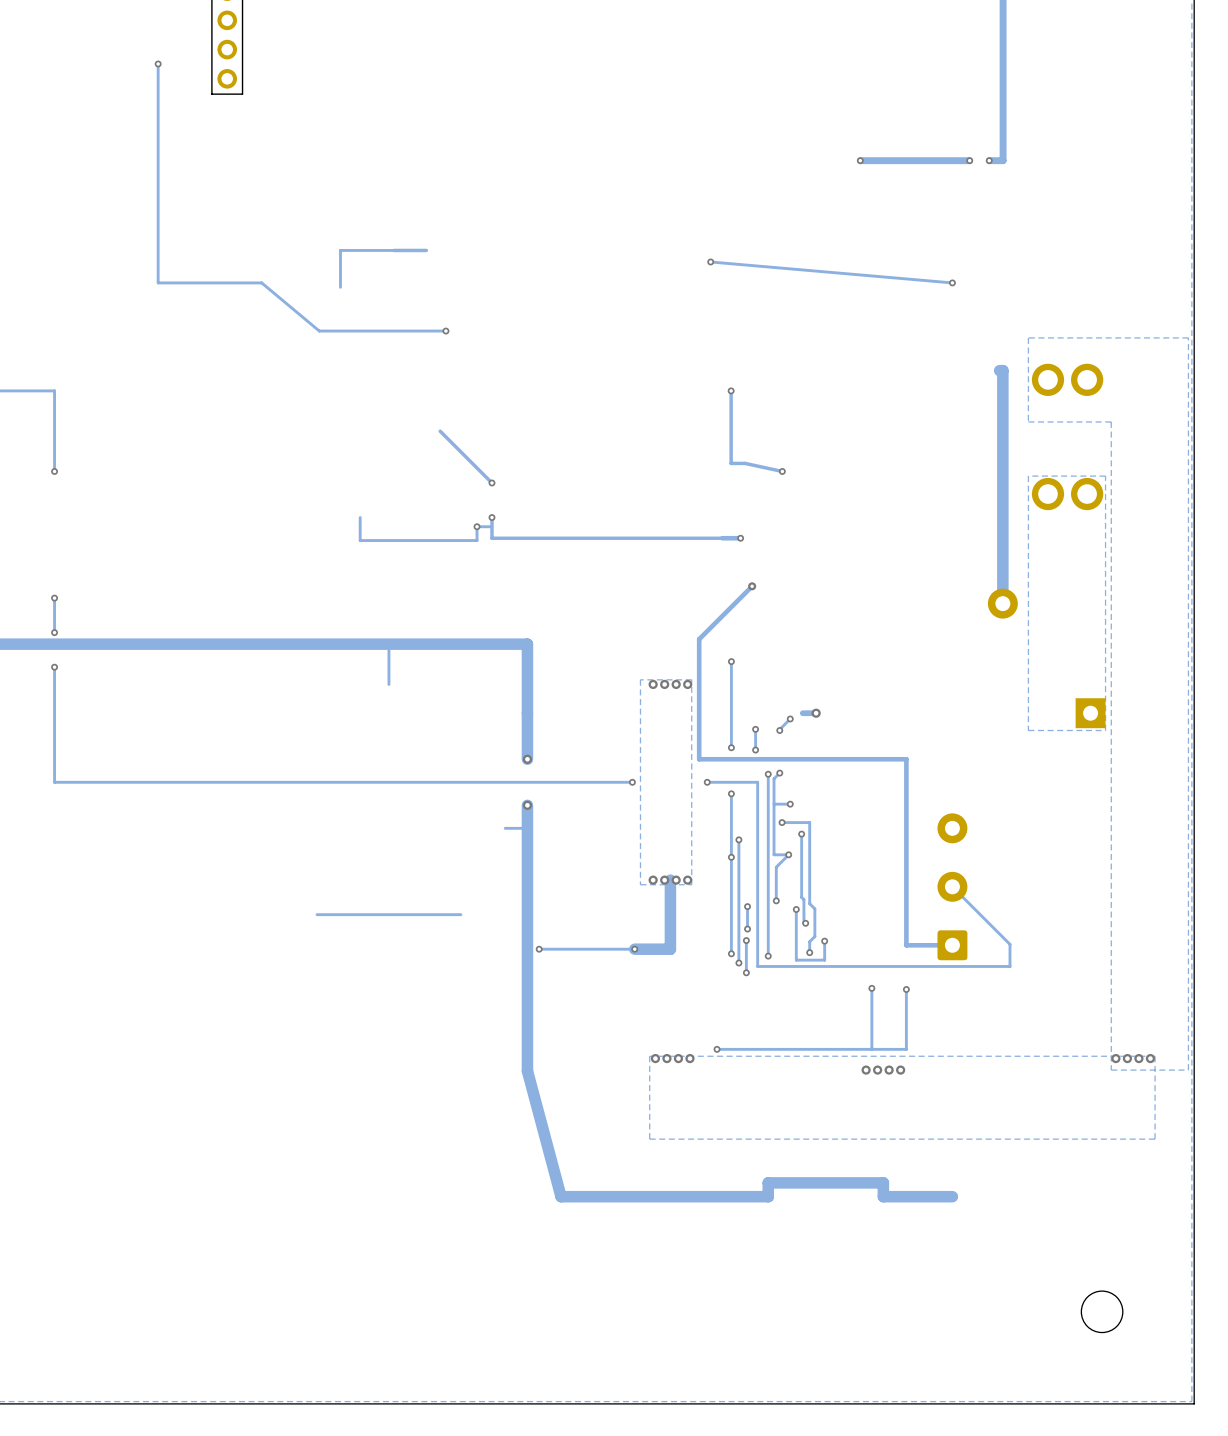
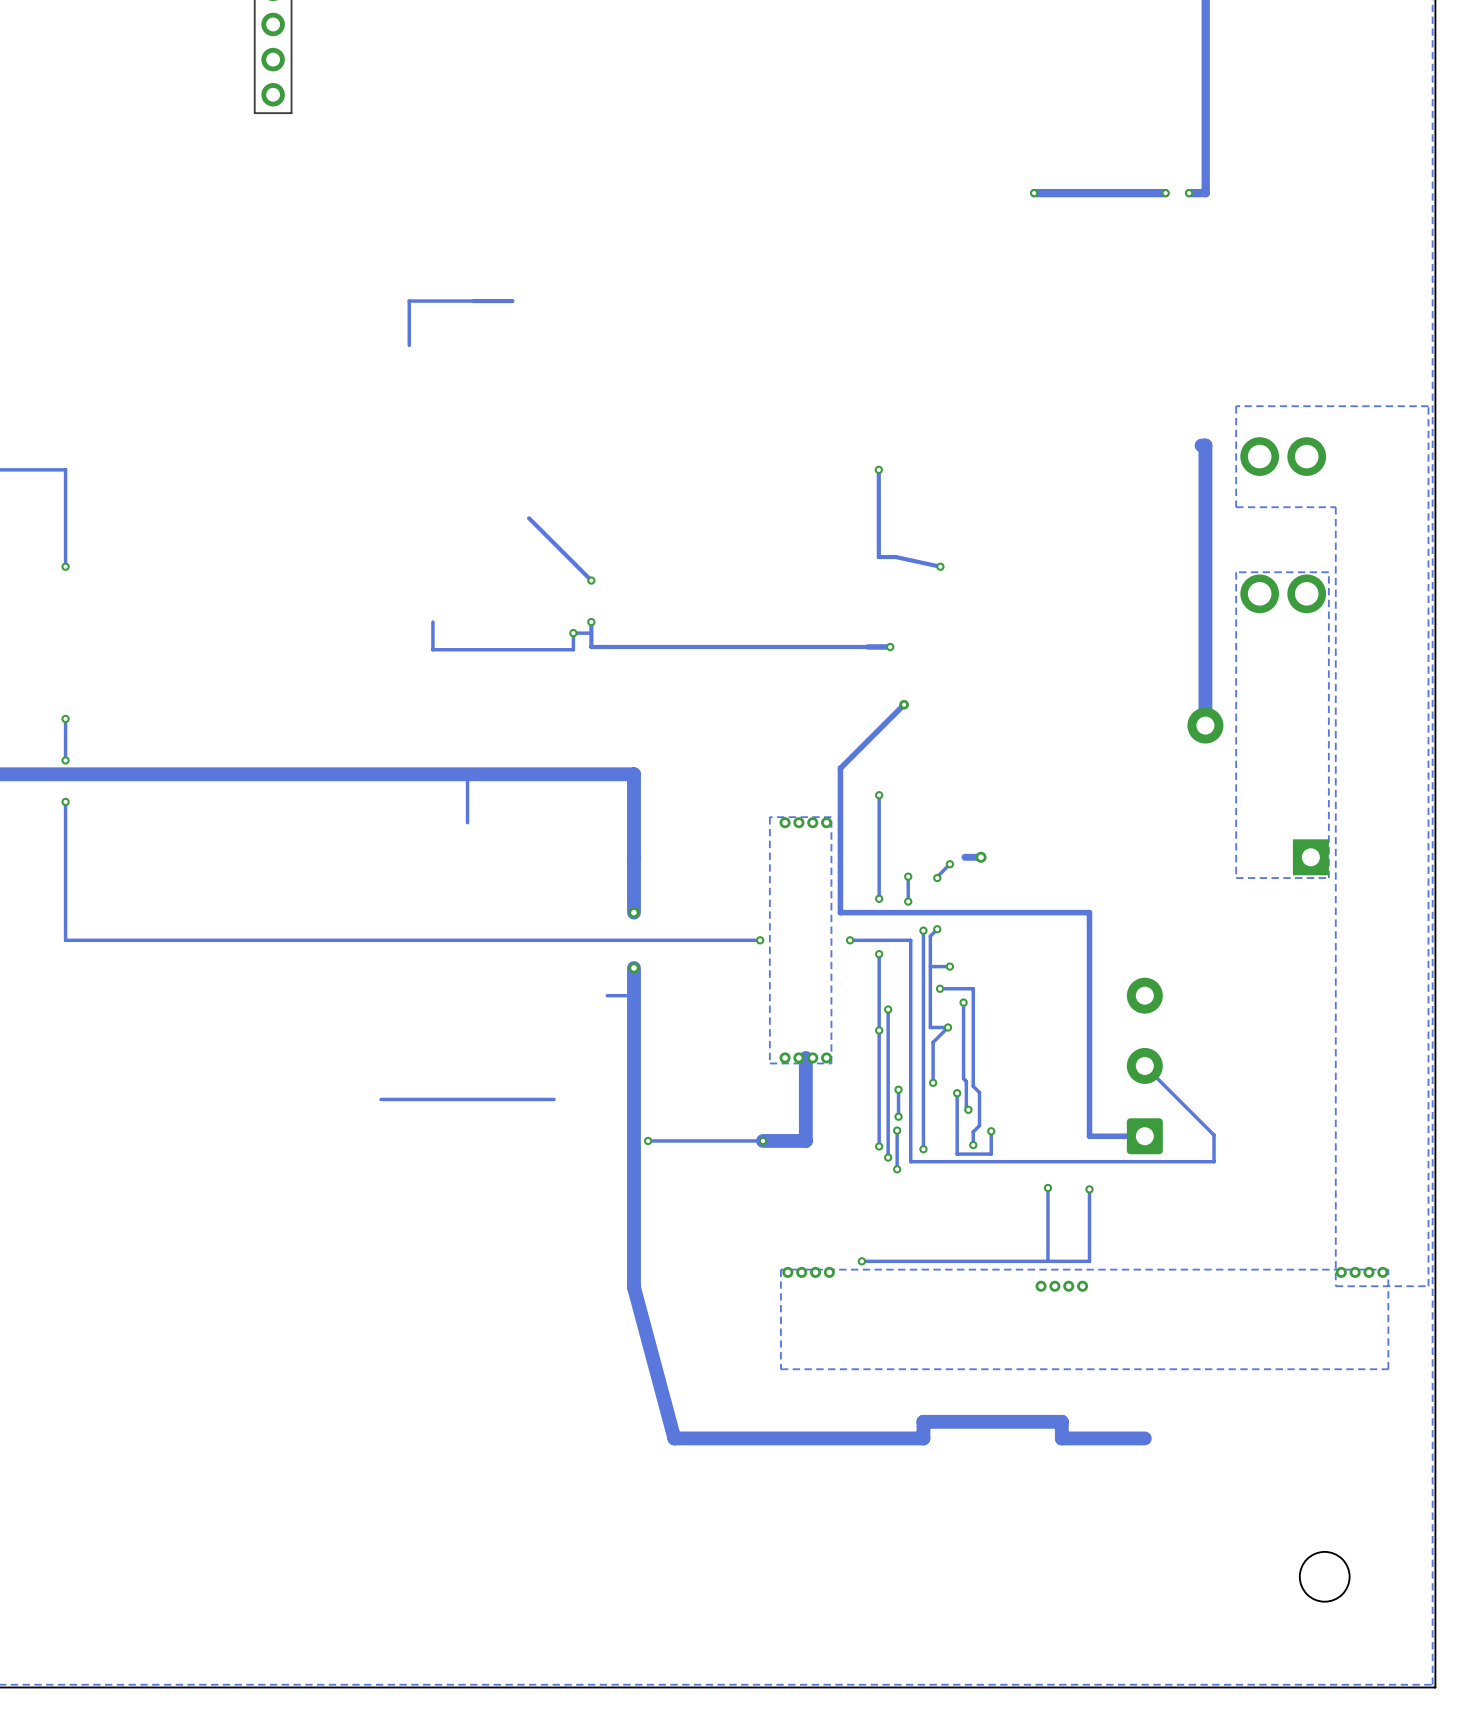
track: (158, 63) (158, 282) (261, 282) (319, 331) (445, 331) -> none
via: (158, 63) -> none
track: (710, 261) (952, 282) -> none
via: (710, 261) -> none
via: (952, 282) -> none
via: (445, 331) -> none

